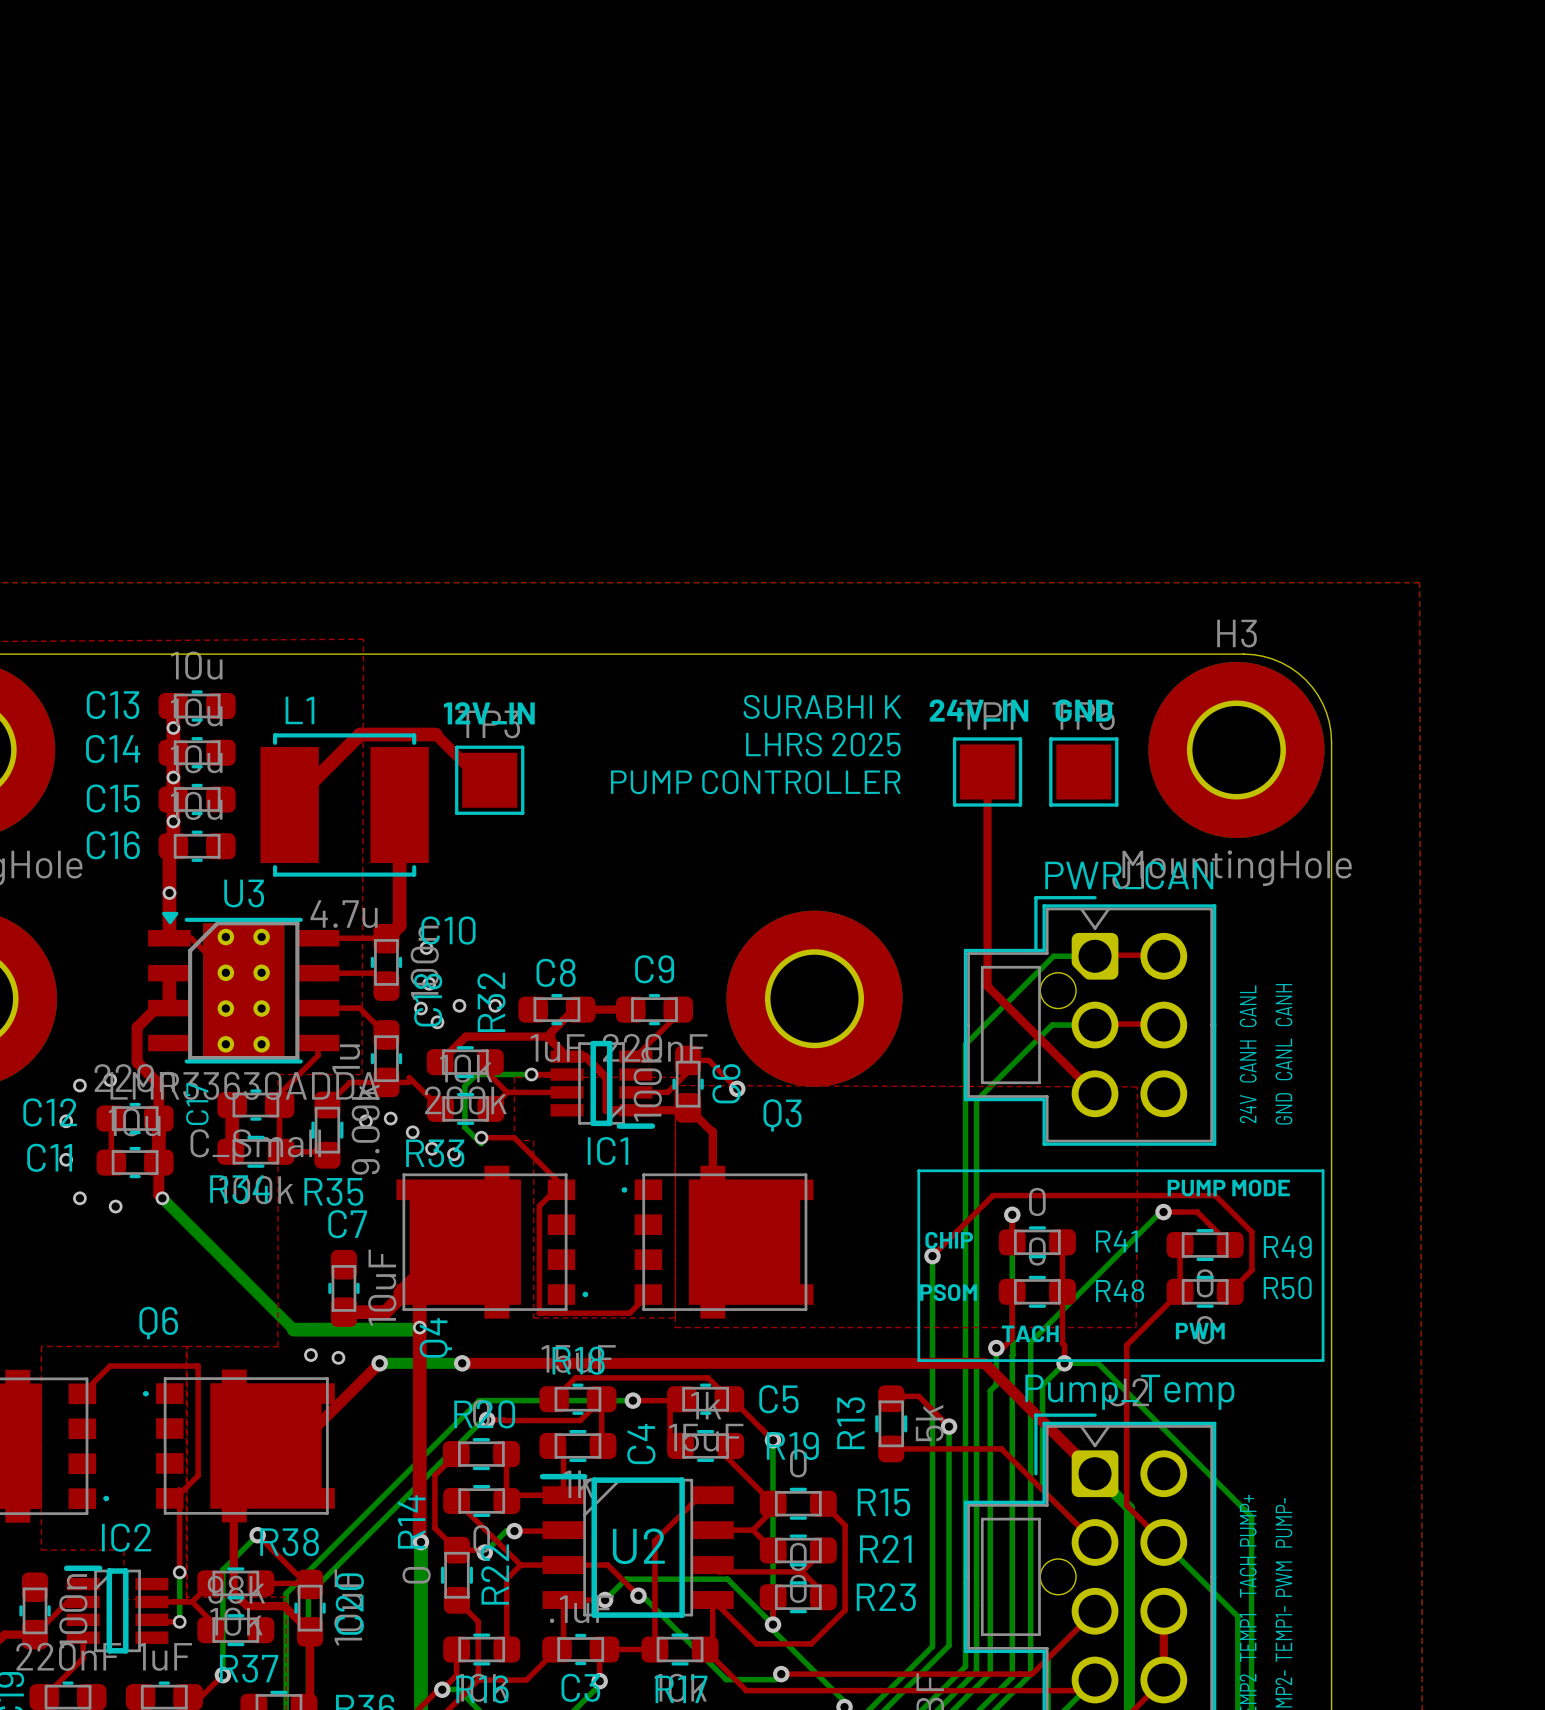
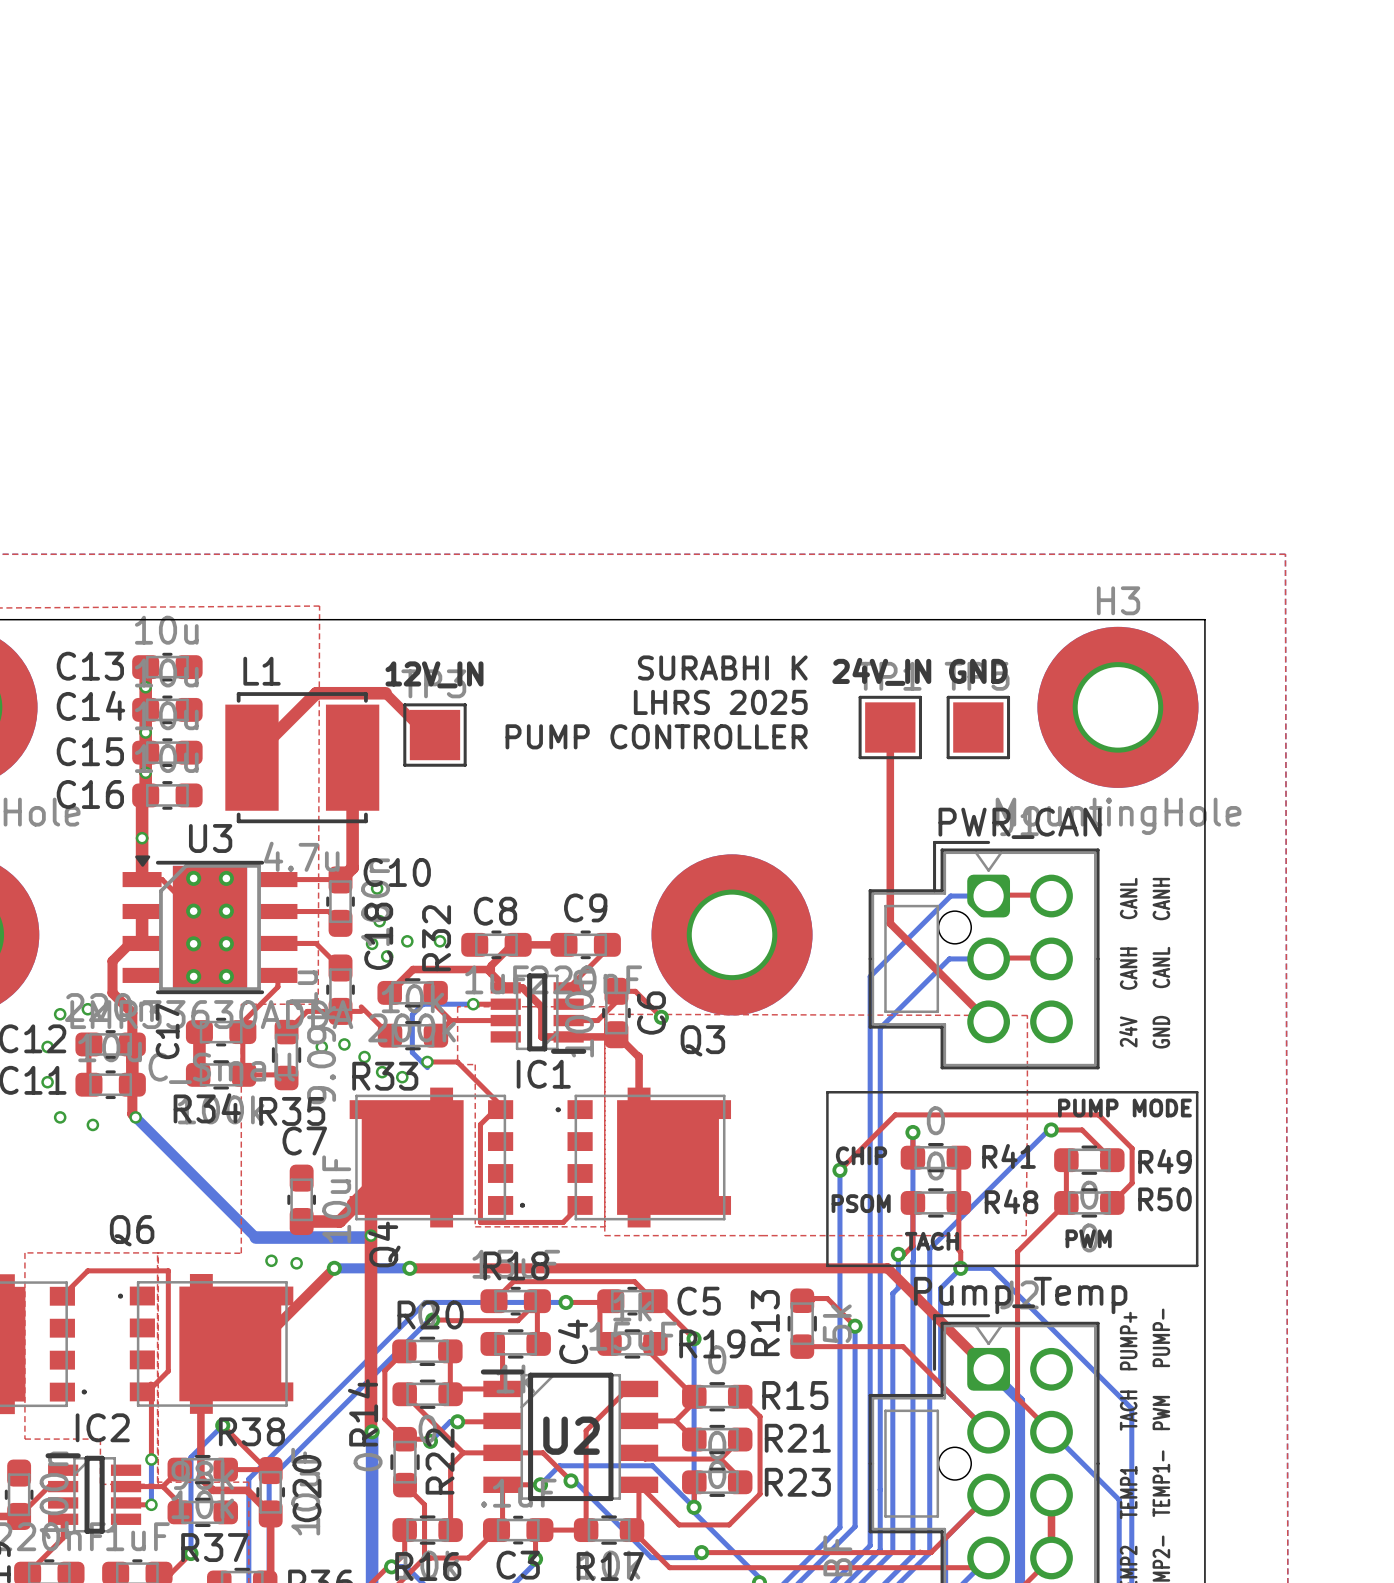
board edge: (1243, 654) (1263, 656) (1281, 662) (1305, 679) (1322, 703) (1329, 722) (1331, 742) -> (1124, 619) (1204, 619) (1204, 700)

